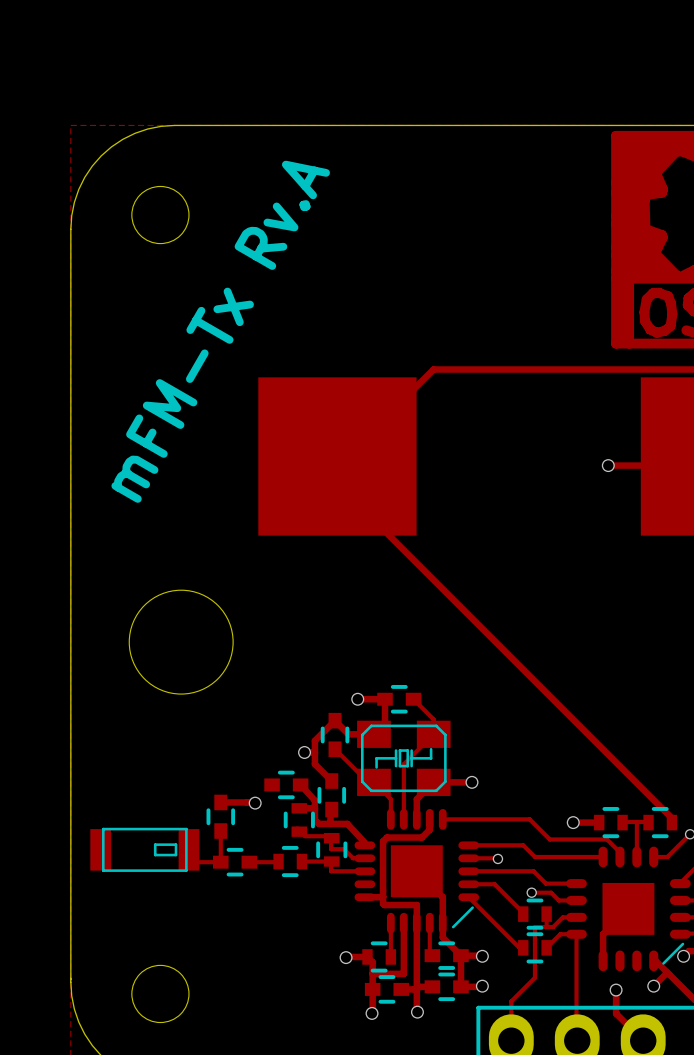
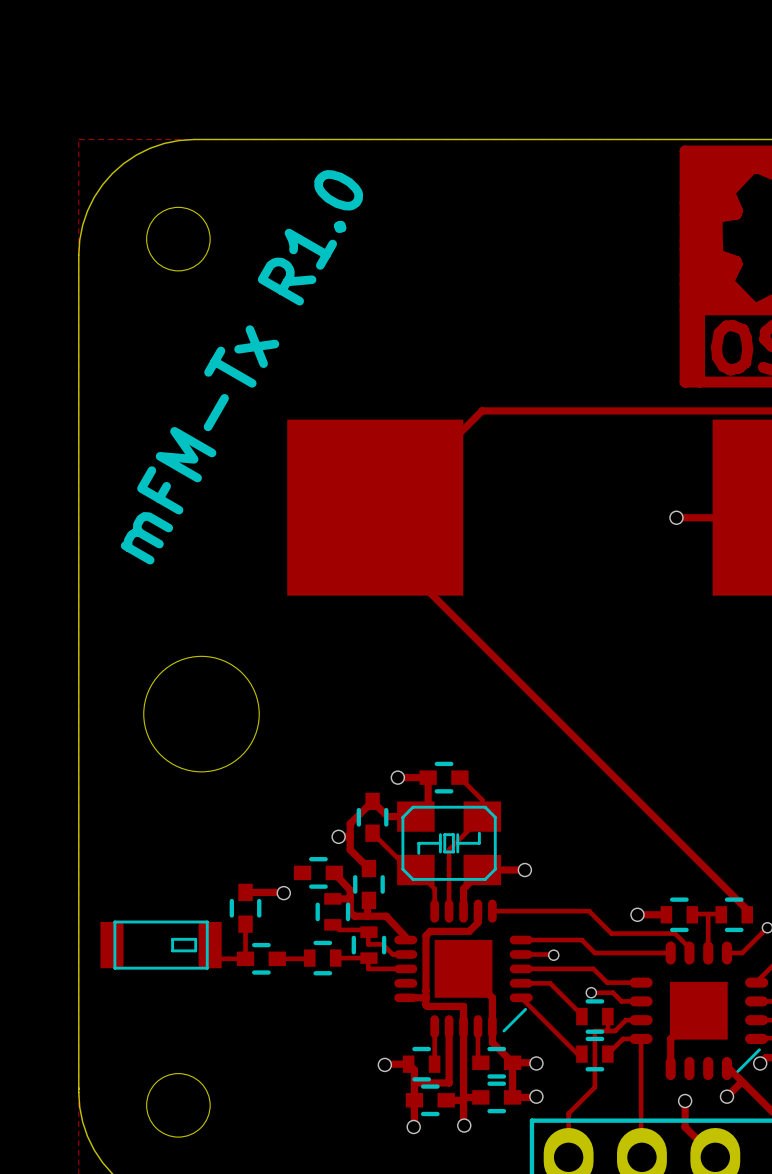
text: mFM-Tx Rv.A (220, 331) -> mFM-Tx R1.0 (241, 367)

